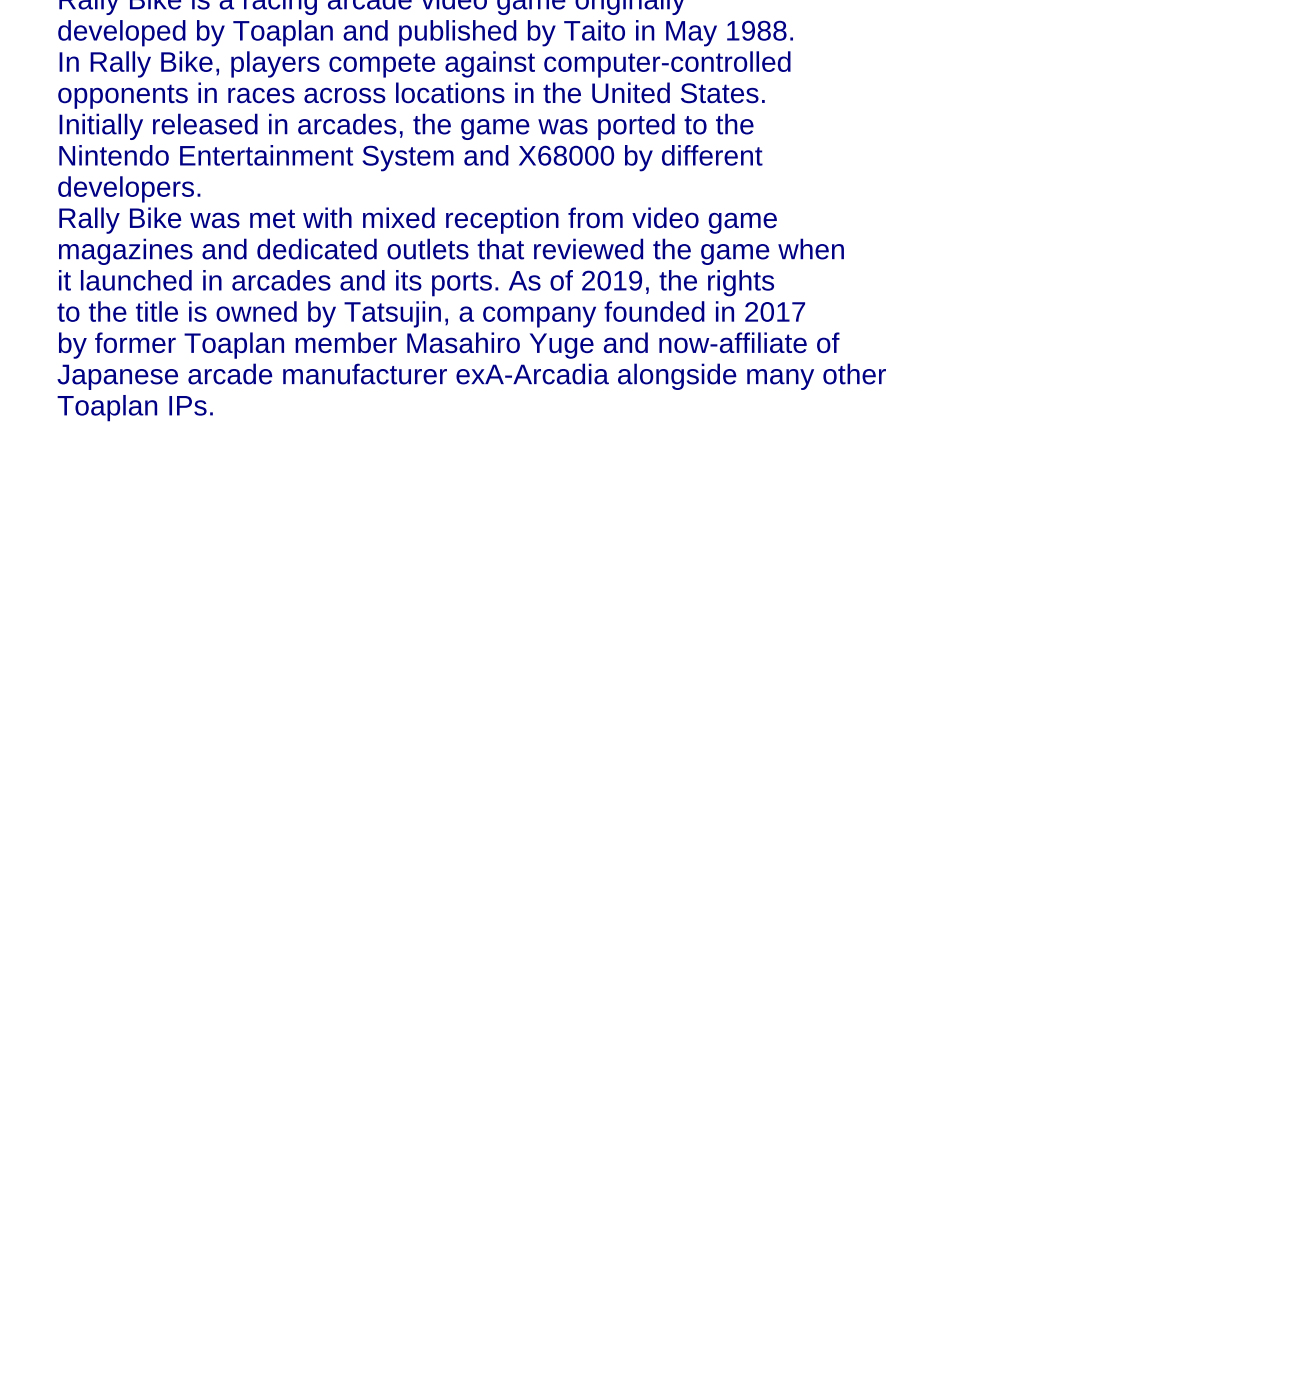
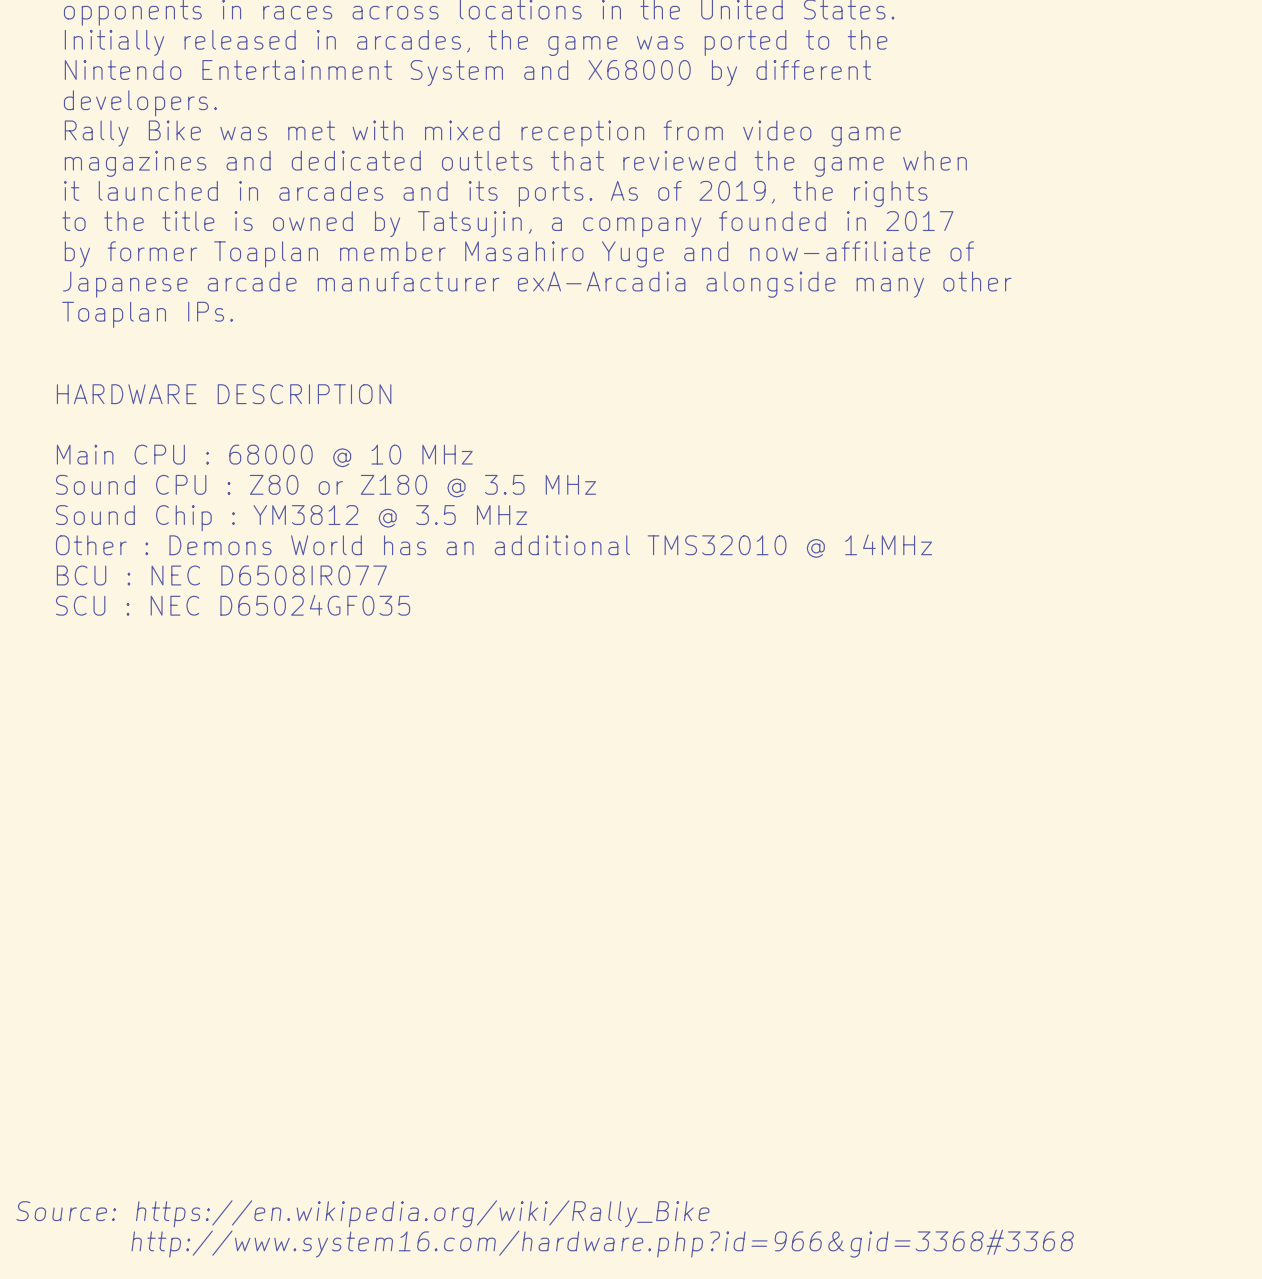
text: none -> HARDWARE DESCRIPTION (224, 394)
text: none -> Main CPU : 68000 @ 10 MHz (264, 455)
text: none -> Sound CPU : Z80 or Z180 @ 3.5 MHz (326, 486)
text: none -> Sound Chip : YM3812 @ 3.5 MHz (291, 518)
text: none -> Other : Demons World has an additional TMS32010 @ 14MHz (494, 546)
text: none -> BCU : NEC D6508IR077 (221, 575)
text: none -> SCU : NEC D65024GF035 (233, 605)
text: none -> Source: https://en.wikipedia.org/wiki/Rally_Bike (362, 1213)
text: none -> http://www.system16.com/hardware.php?id=966&gid=3368#3368 (602, 1243)

